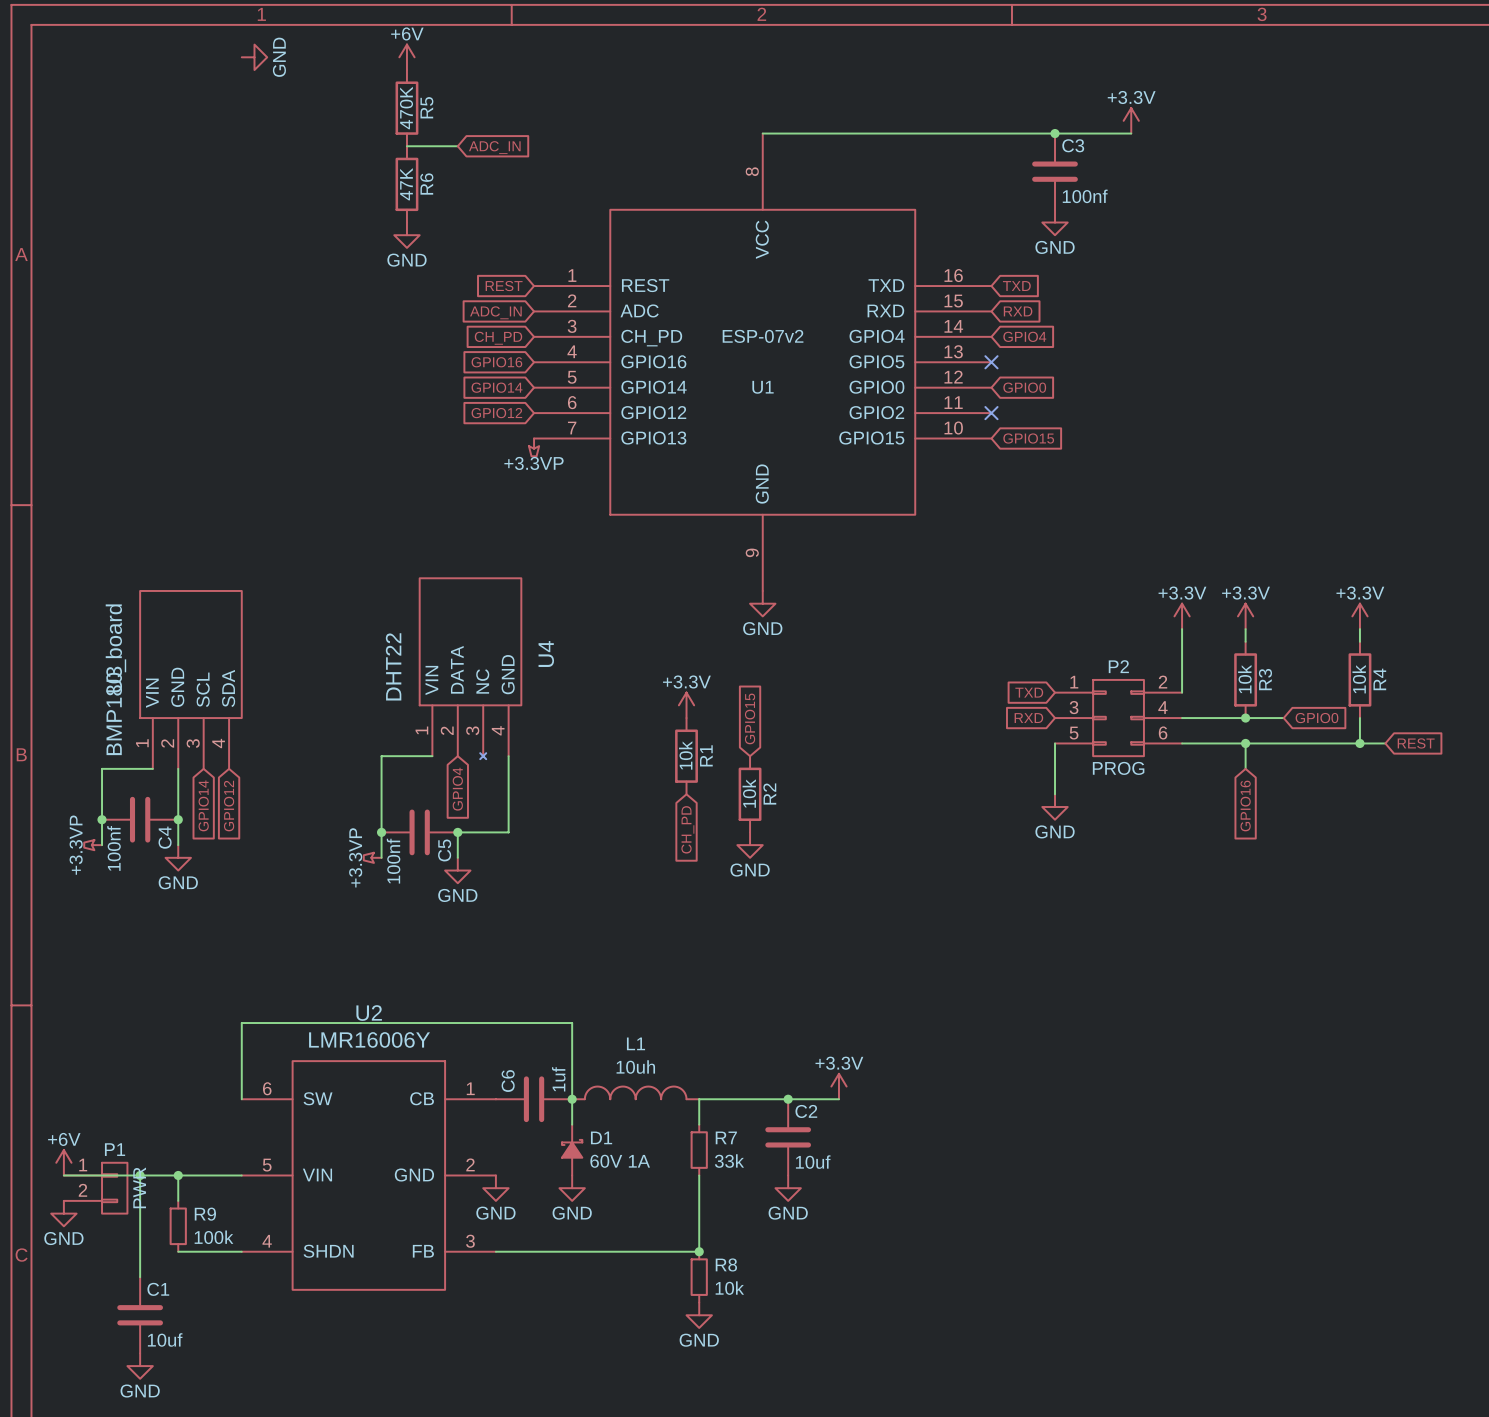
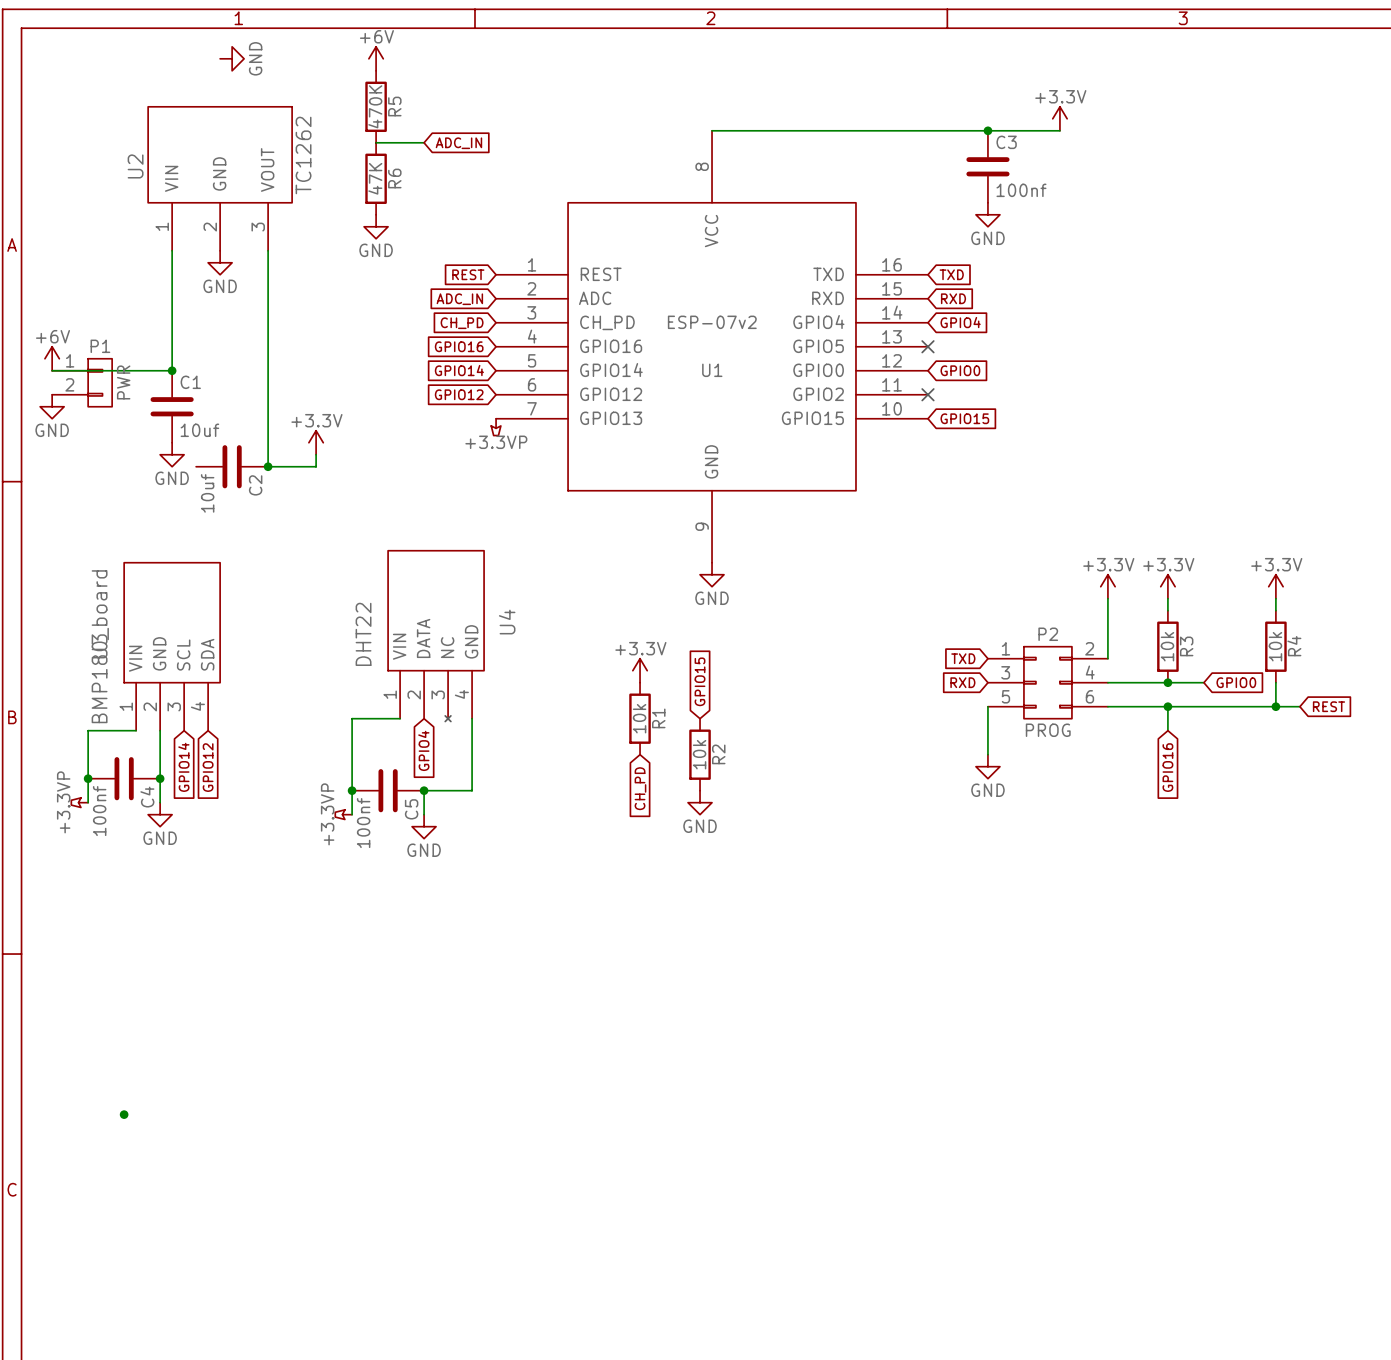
wire: none -> (172, 250) (172, 370) (52, 370)
wire: none -> (268, 250) (268, 466) (316, 466) (316, 454)
power symbol: none -> GND (220, 262)
power symbol: none -> +6V (52, 358)
junction: none -> (172, 370)
power symbol: none -> GND (52, 406)
power symbol: none -> +3.3V (316, 442)
power symbol: none -> GND (172, 454)
junction: none -> (268, 466)
U2 name position: U2 (369, 1013) -> U2 (135, 166)
U2 value: LMR16006Y (369, 1039) -> TC1262 (303, 155)
U2 symbol: [241, 1061, 496, 1290] -> [148, 106, 293, 251]
power symbol: +3.3V (838, 1086) -> none
L1: 10uh (635, 1092) -> none
wire: (241, 1099) (241, 1023) (572, 1023) (572, 1124) -> none
C6: 1uf (534, 1099) -> none
junction: (572, 1099) -> none
junction: (788, 1099) -> none
wire: (838, 1099) (699, 1099) (699, 1124) -> none
C2 rotation: 0° (788, 1137) -> 90° clockwise (232, 466)
C2 position: (788, 1137) -> (232, 466)
D1: 60V 1A (572, 1150) -> none
R7: 33k (699, 1150) -> none
power symbol: +6V (63, 1162) -> none
wire: (63, 1175) (241, 1175) -> none
wire: (140, 1175) (140, 1277) -> none
wire: (178, 1175) (178, 1200) -> none
junction: (178, 1175) -> none
wire: (699, 1175) (699, 1251) (495, 1251) -> none
P1 position: (95, 1188) -> (82, 382)
power symbol: GND (495, 1188) -> none
power symbol: GND (572, 1188) -> none
power symbol: GND (788, 1188) -> none
power symbol: GND (63, 1213) -> none
R9: 100k (178, 1226) -> none
wire: (178, 1251) (241, 1251) -> none
junction: (699, 1251) -> none
R8: 10k (699, 1277) -> none
C1 position: (140, 1315) -> (172, 406)
power symbol: GND (699, 1315) -> none
power symbol: GND (140, 1366) -> none

